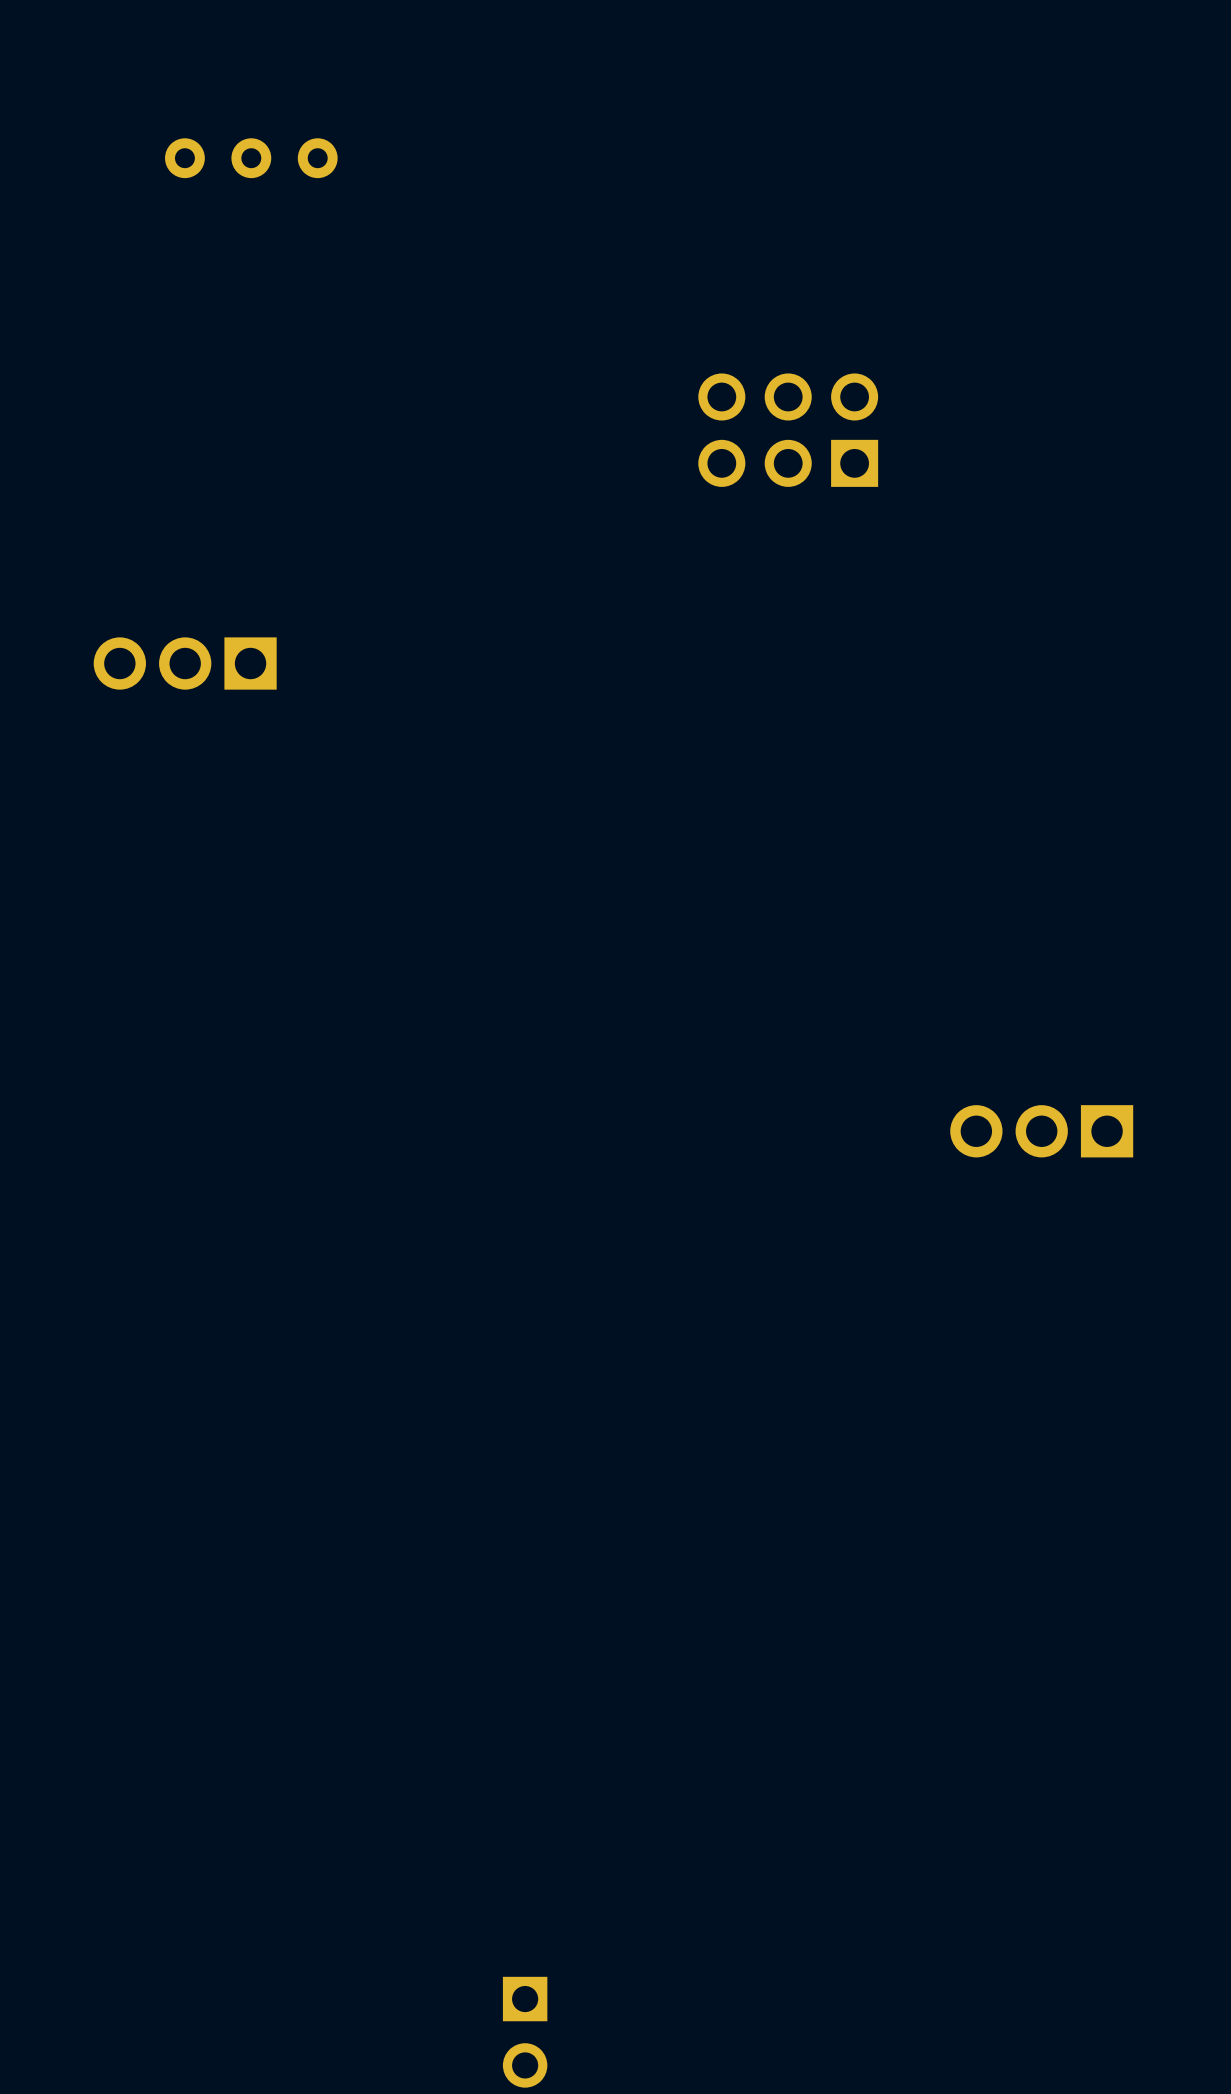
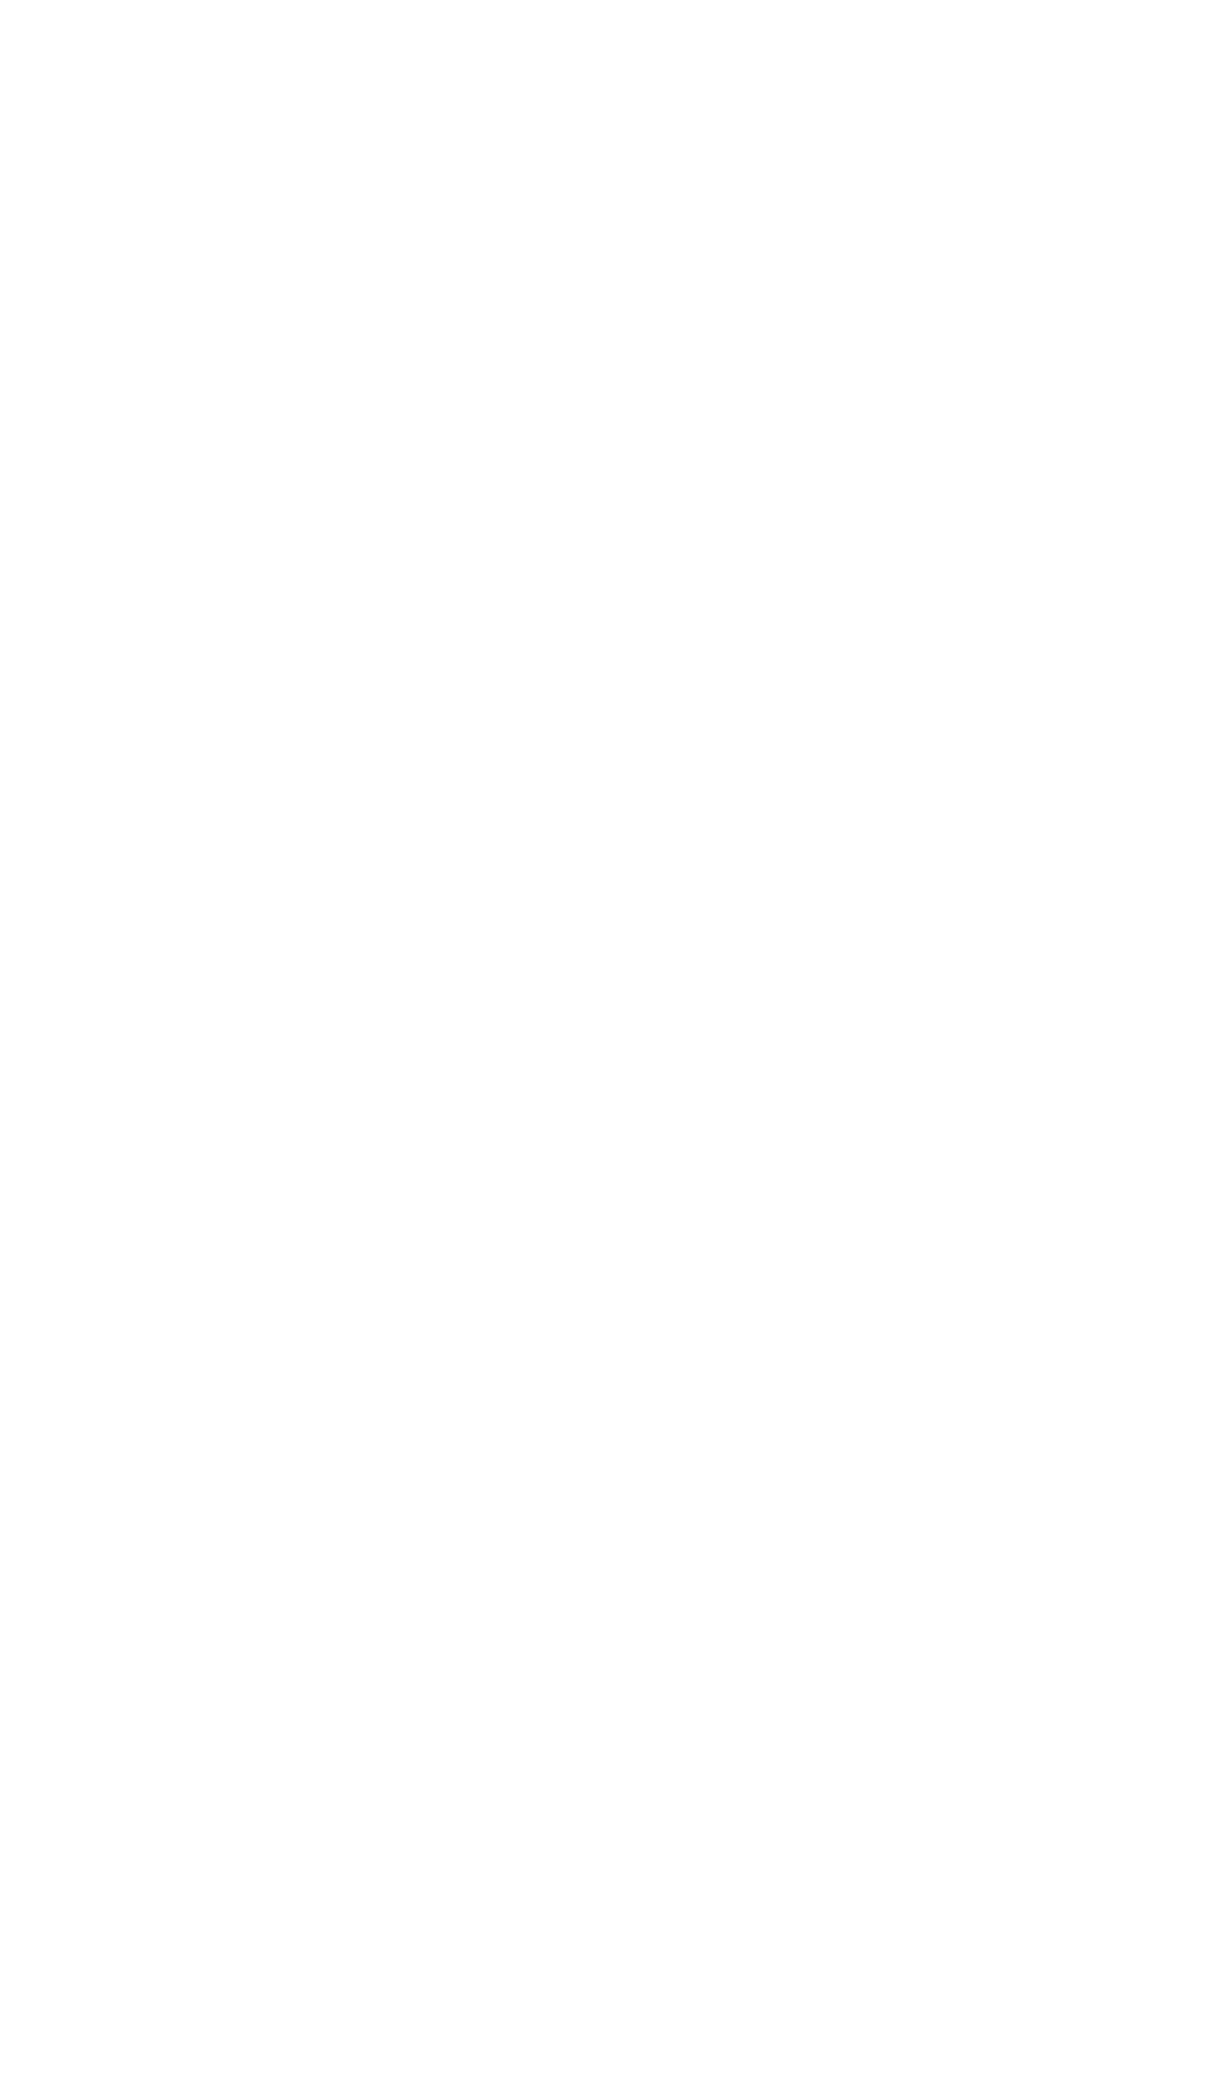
part: (251, 158) -> none
part: (788, 430) -> none
part: (185, 663) -> none
part: (1041, 1131) -> none
part: (525, 2032) -> none

